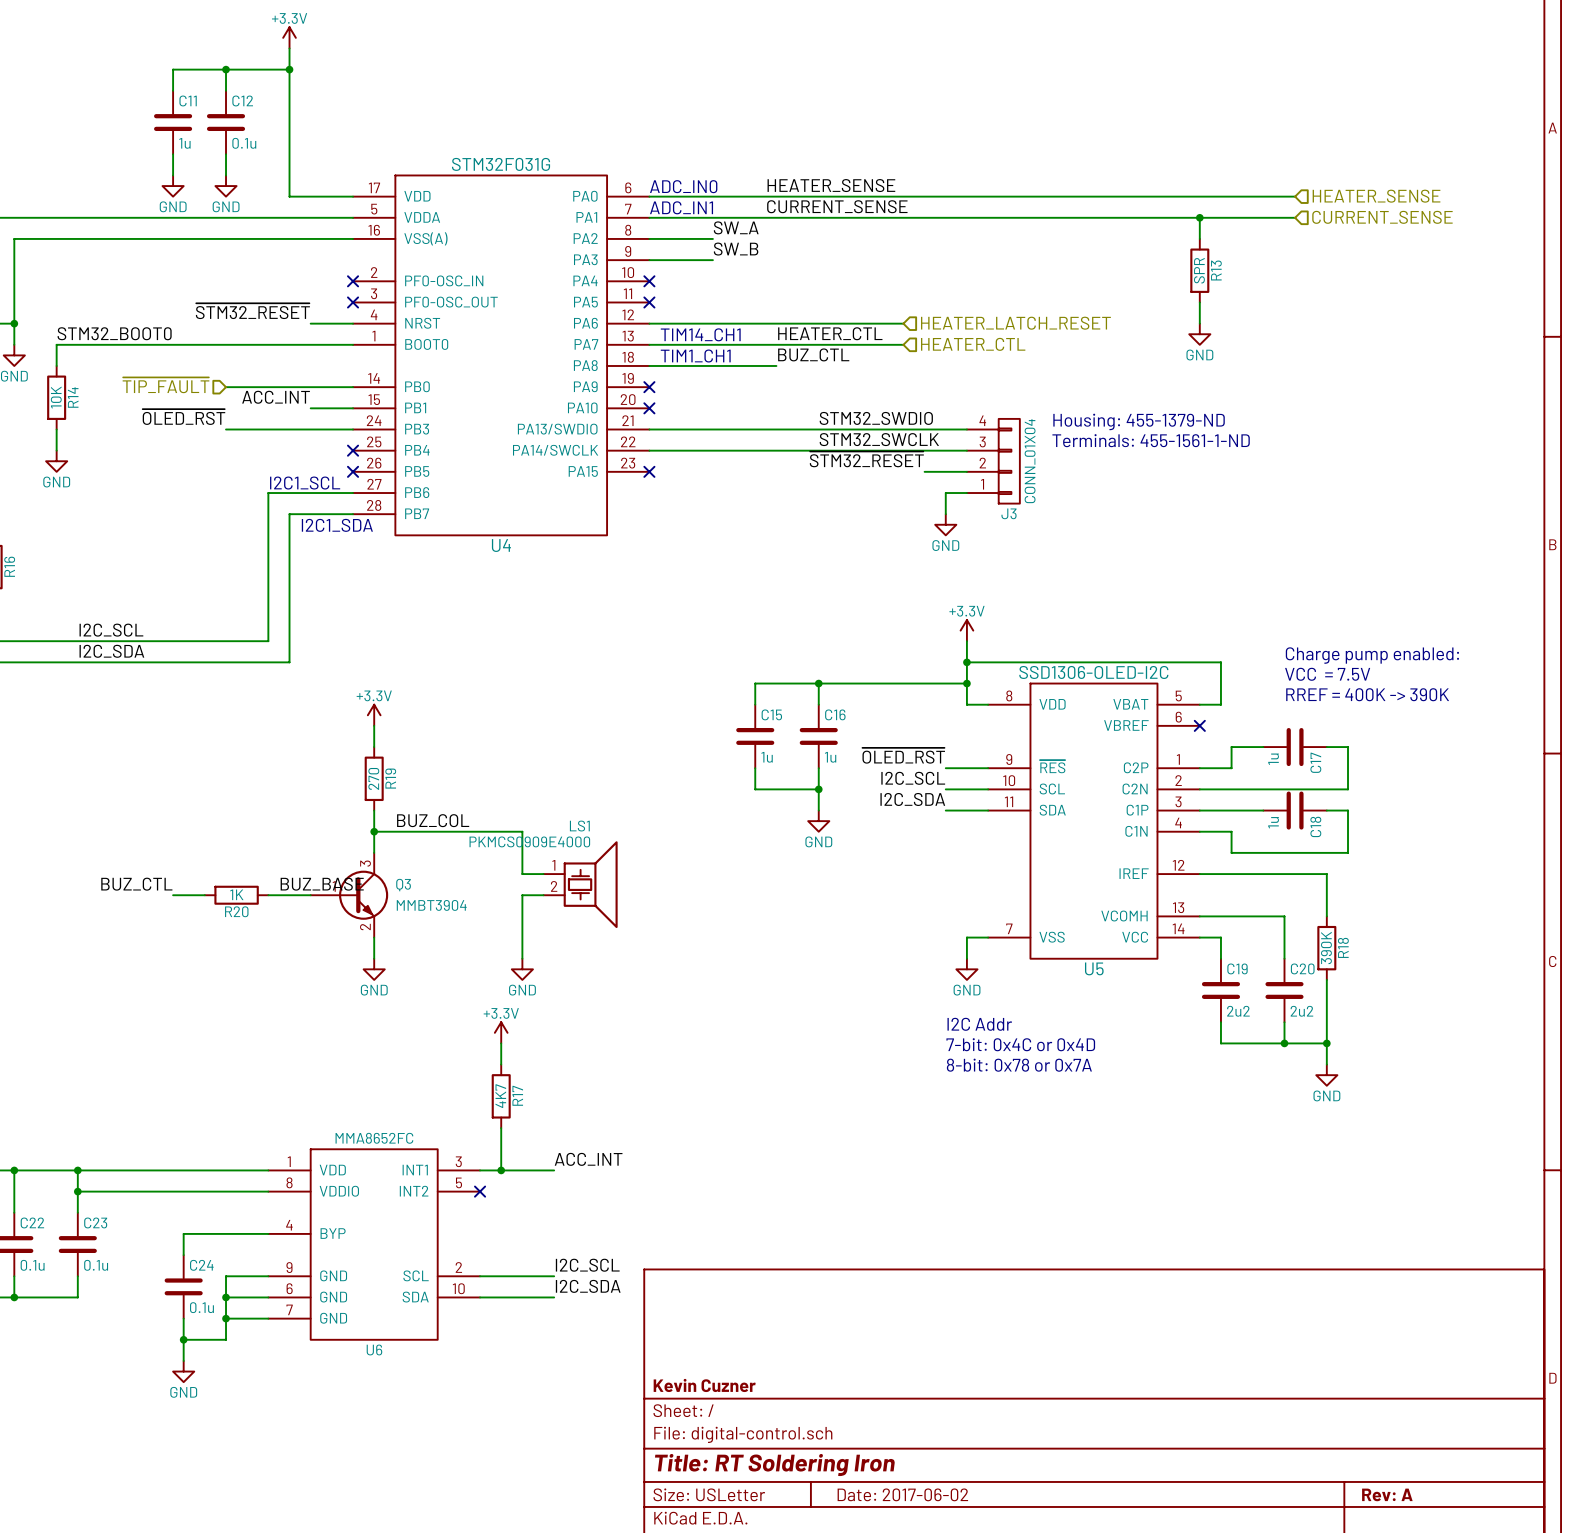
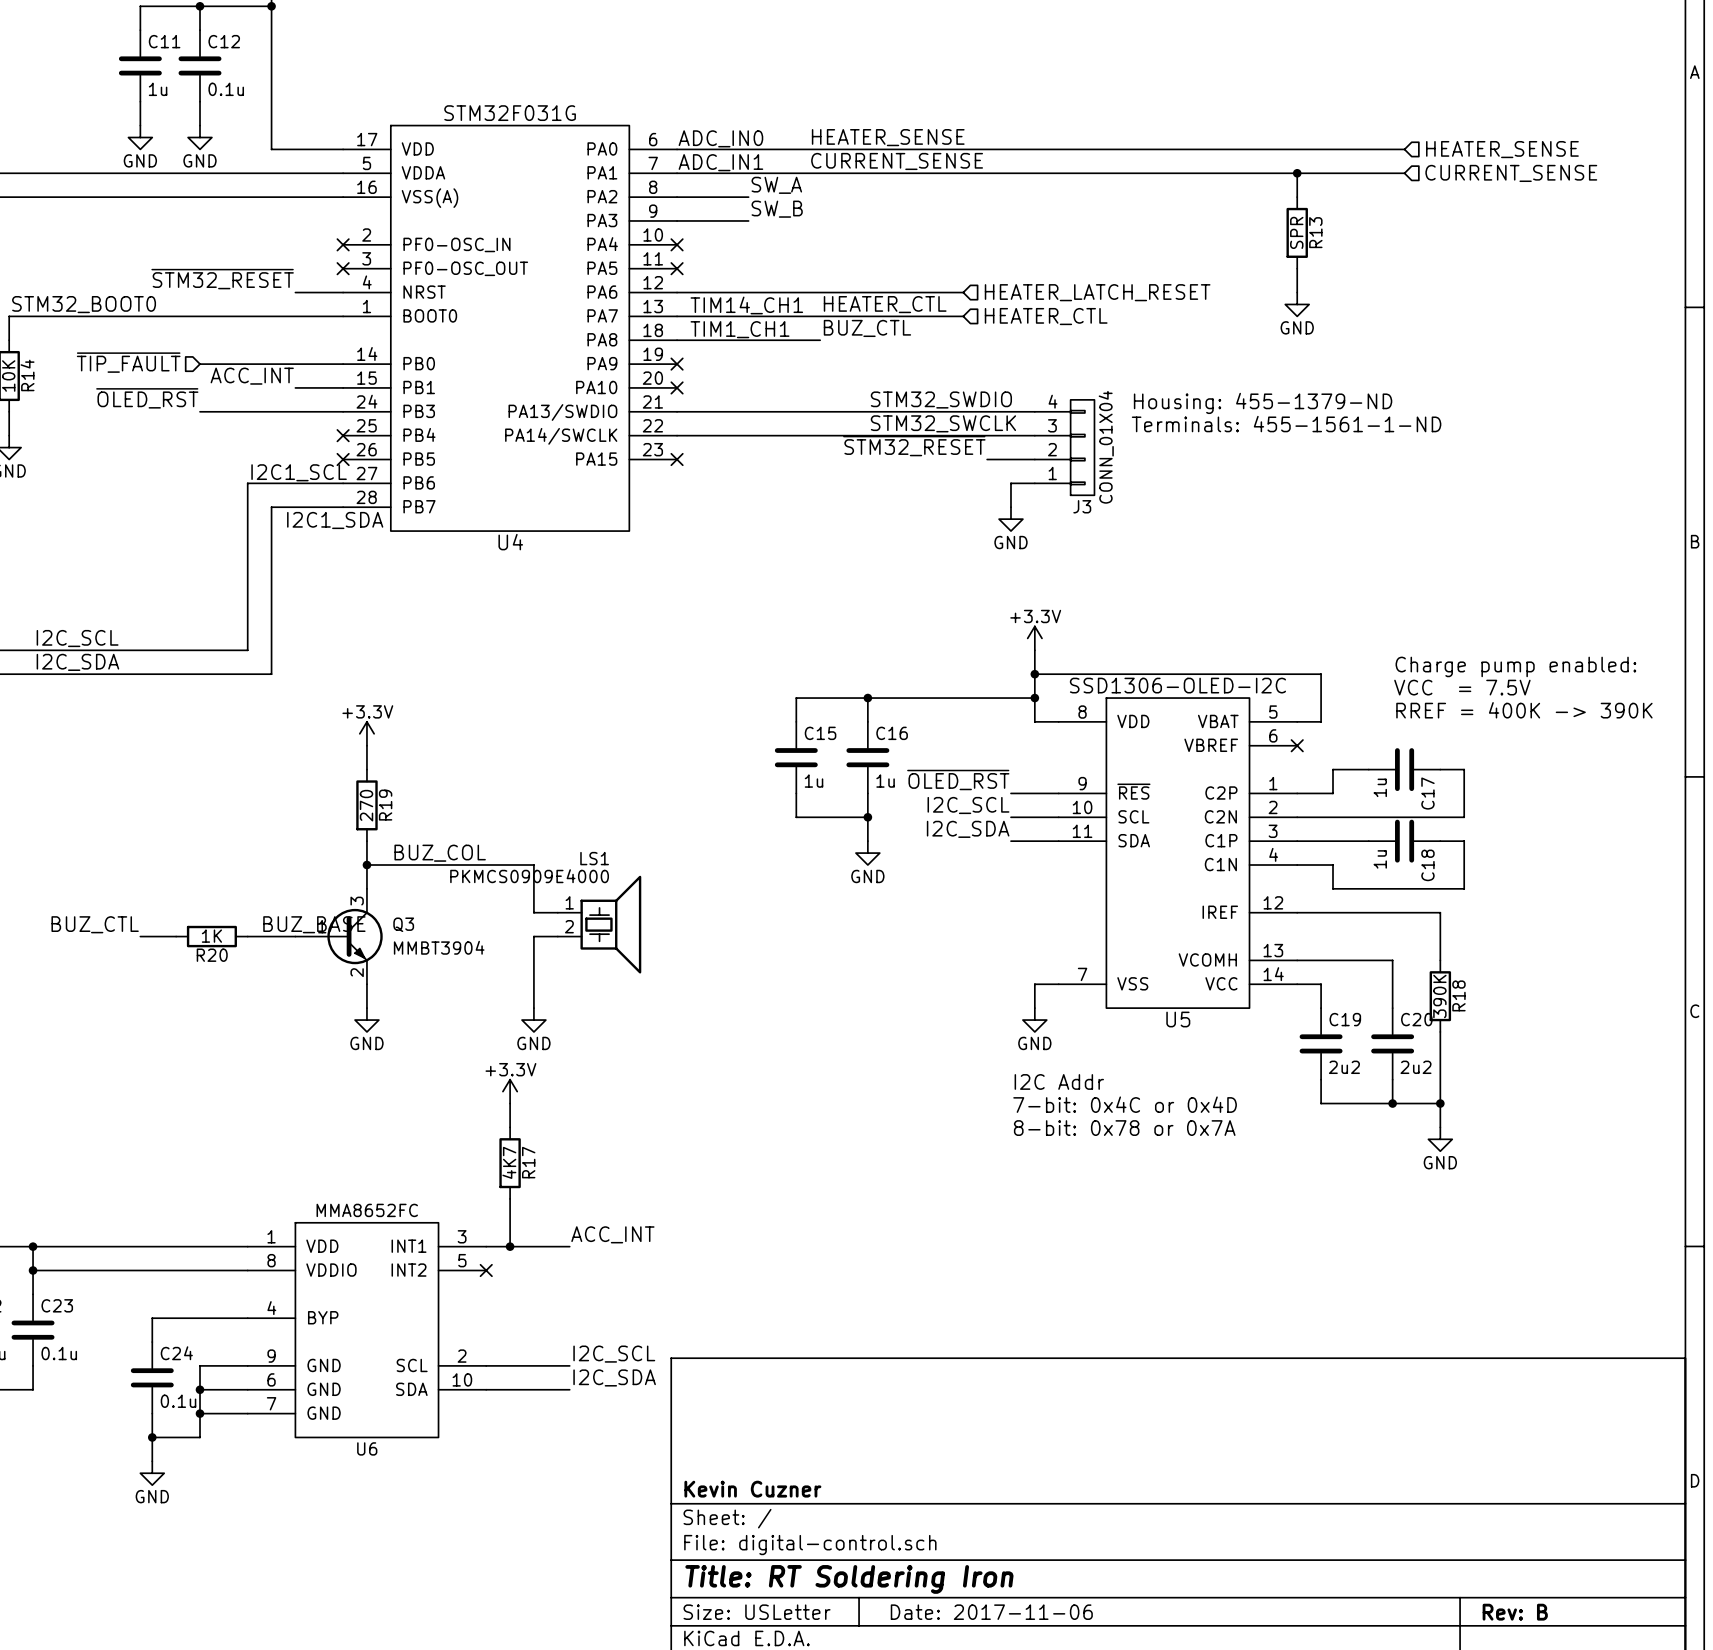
title block: Date: 2017-06-02 (902, 1494) -> Date: 2017-11-06 (991, 1612)
title block: Rev: A (1387, 1494) -> Rev: B (1515, 1612)

